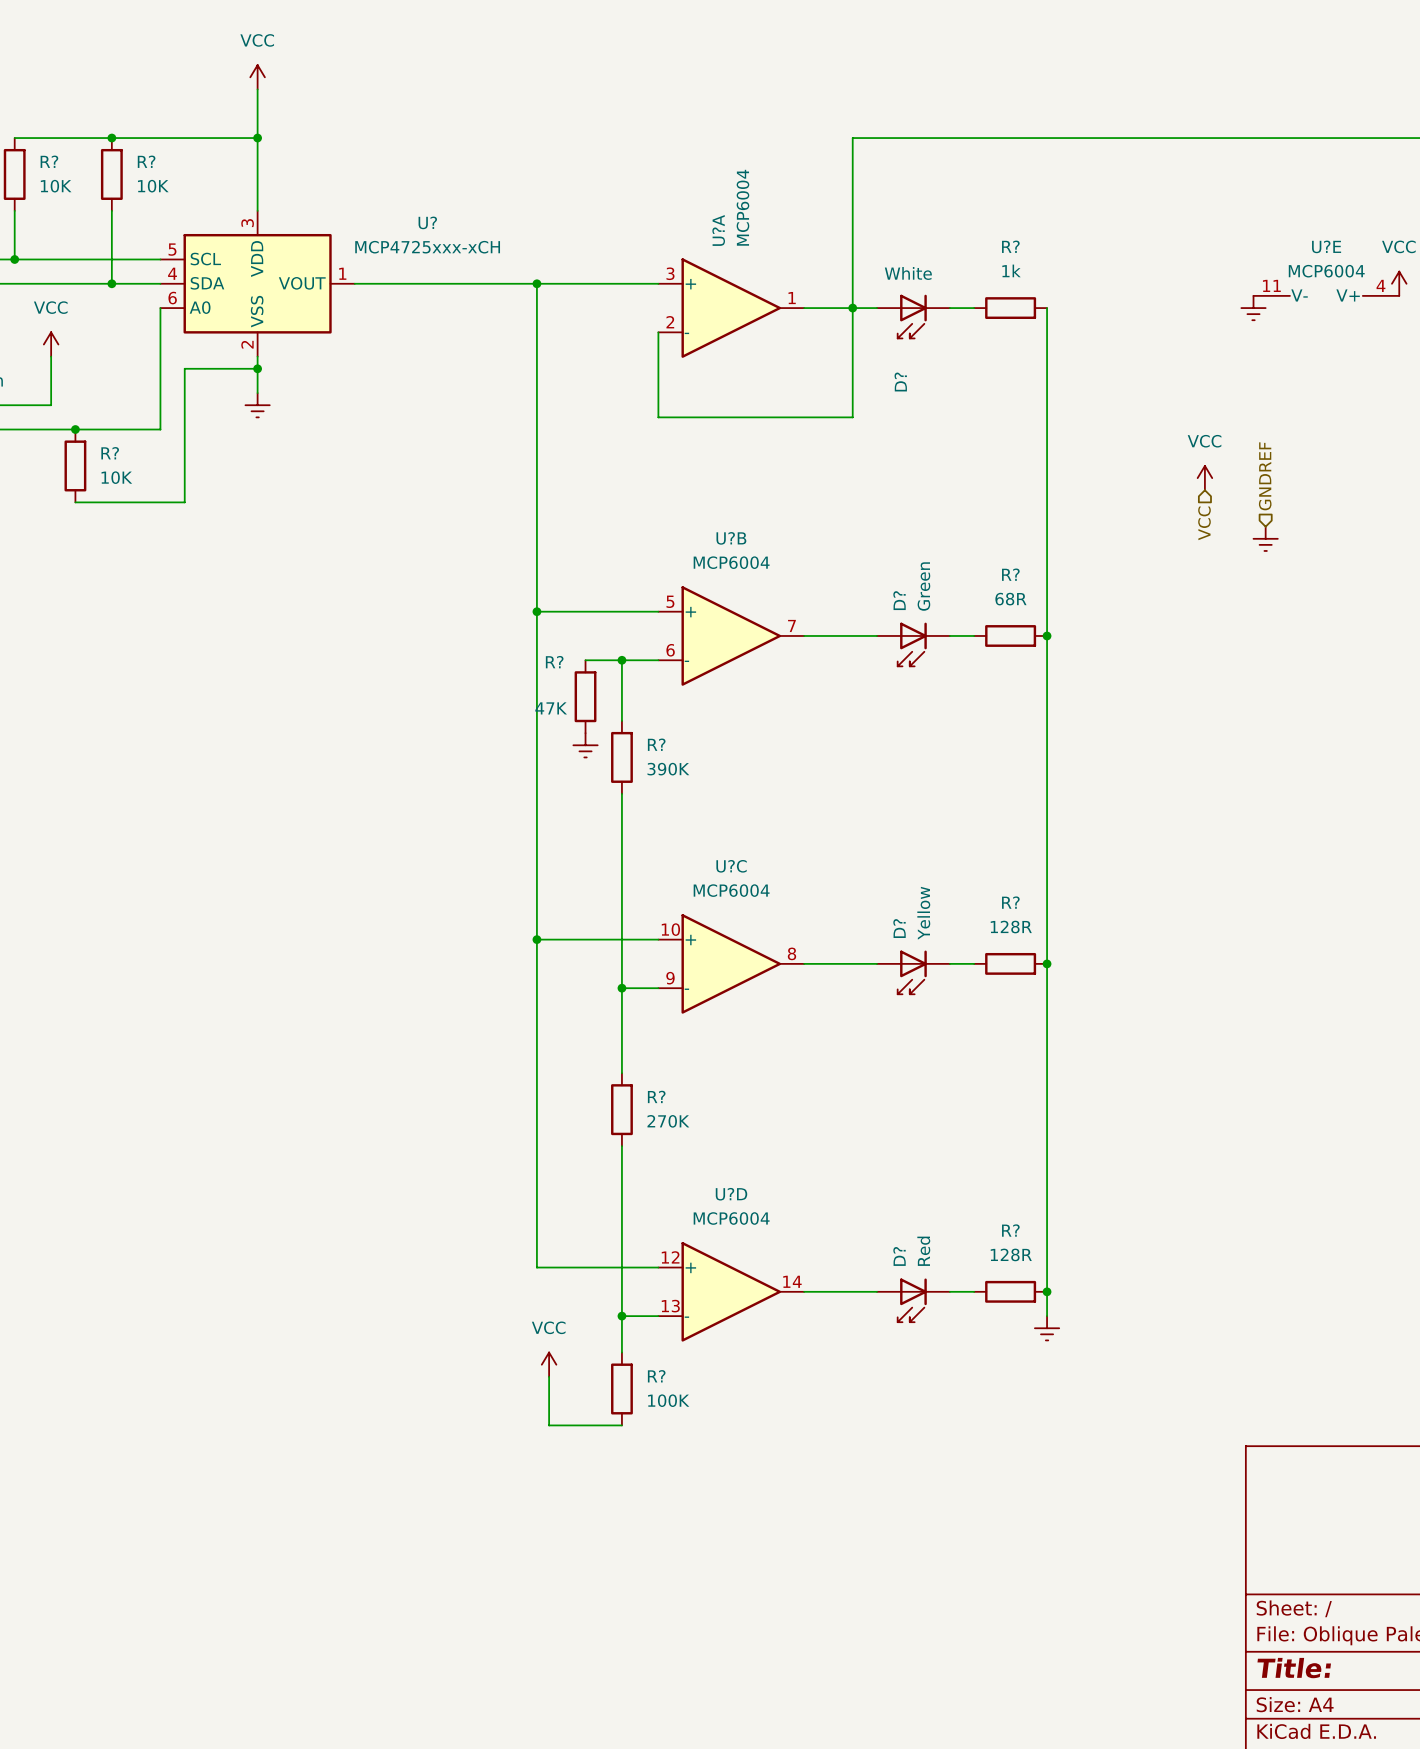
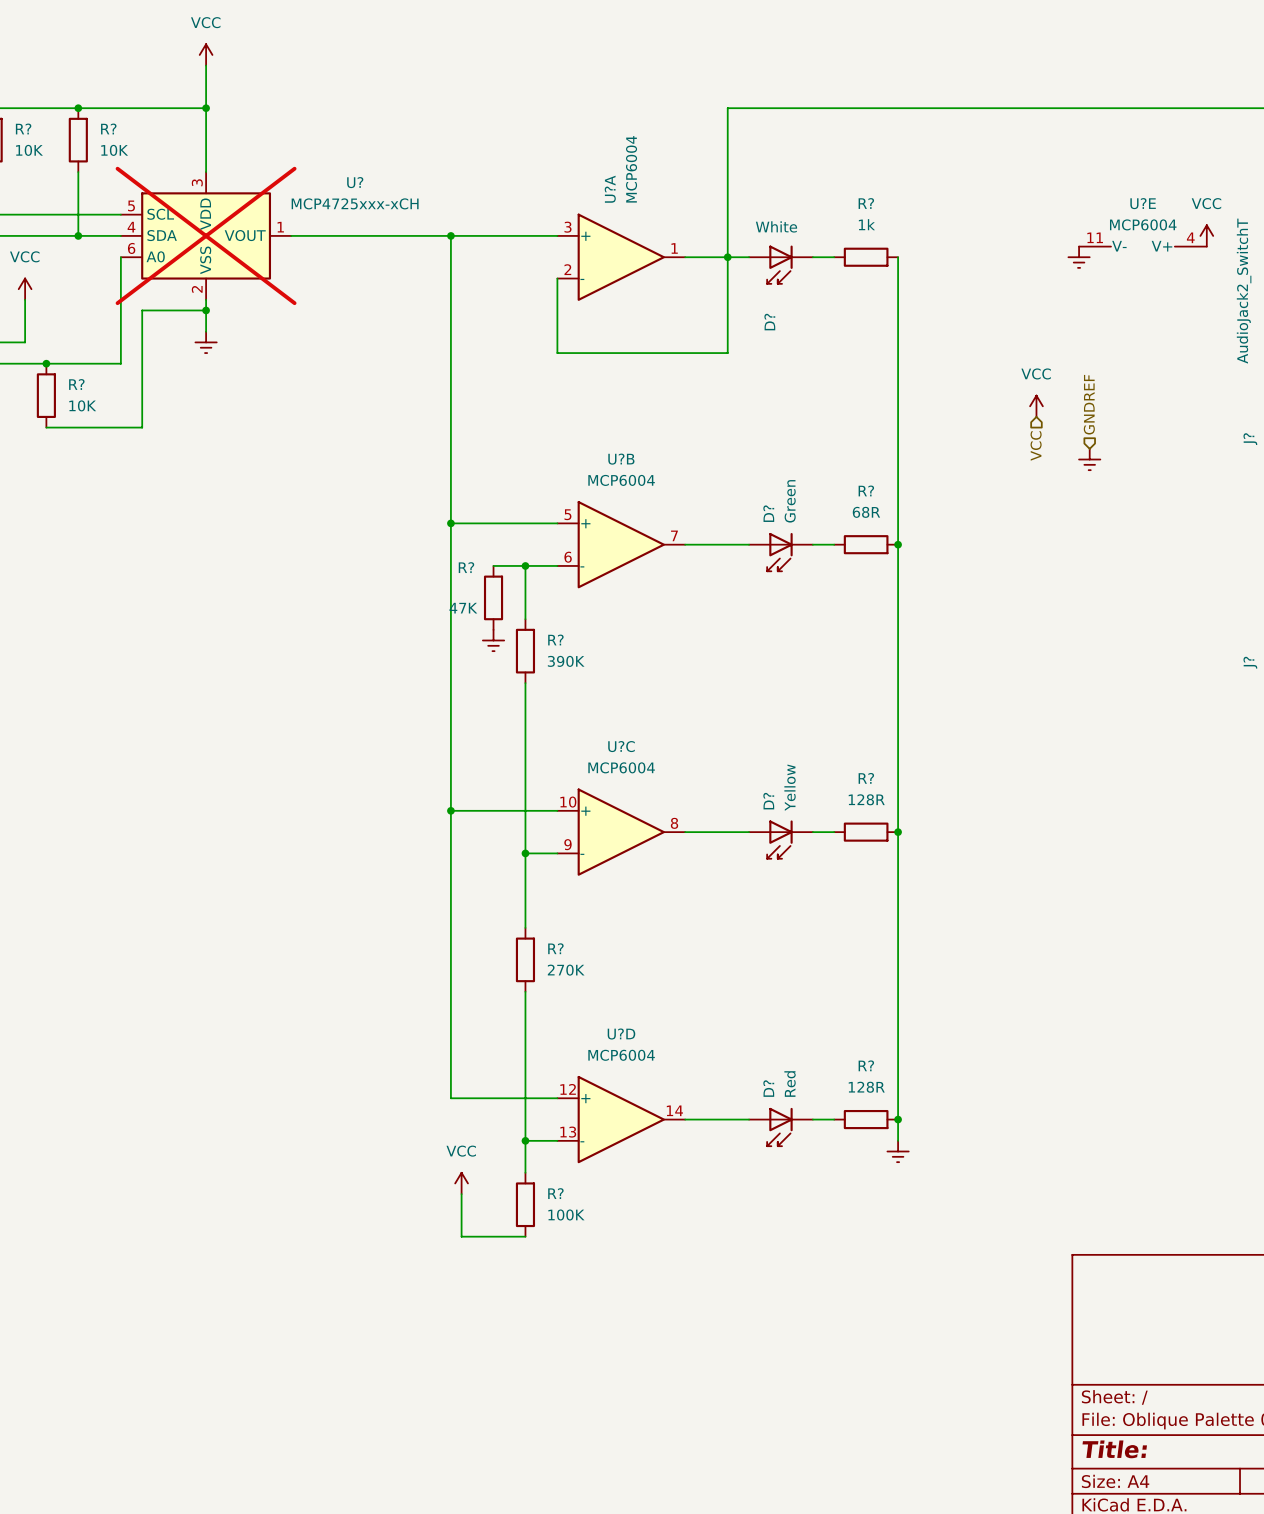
U? do-not-place cross: none -> (206, 235)

